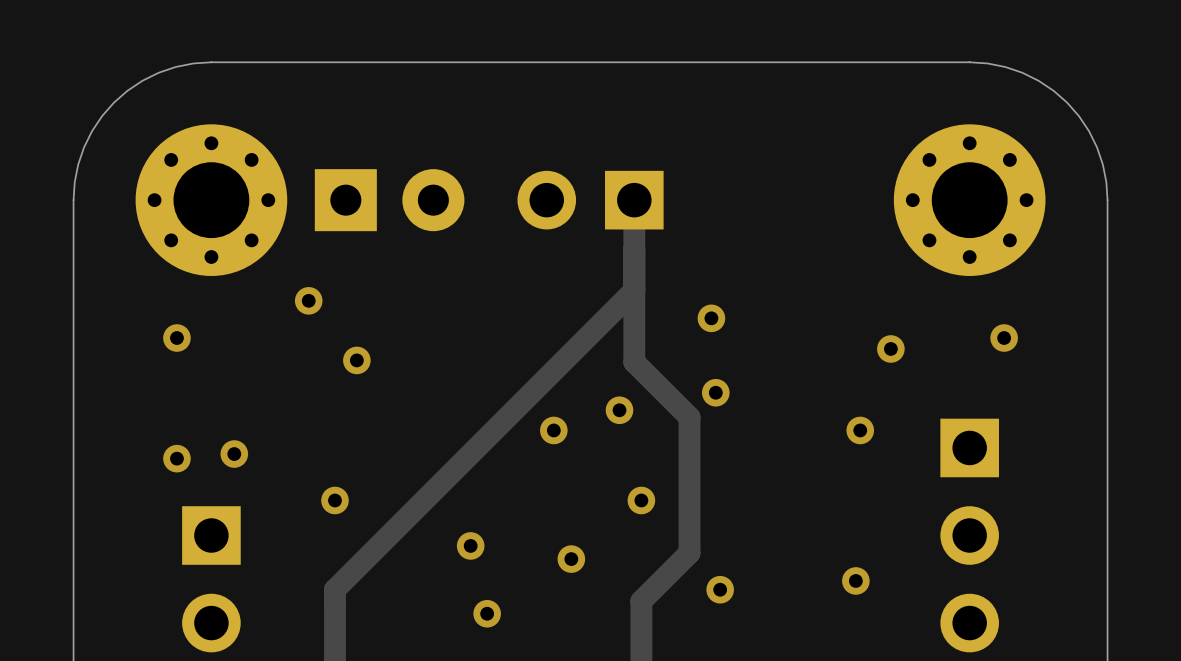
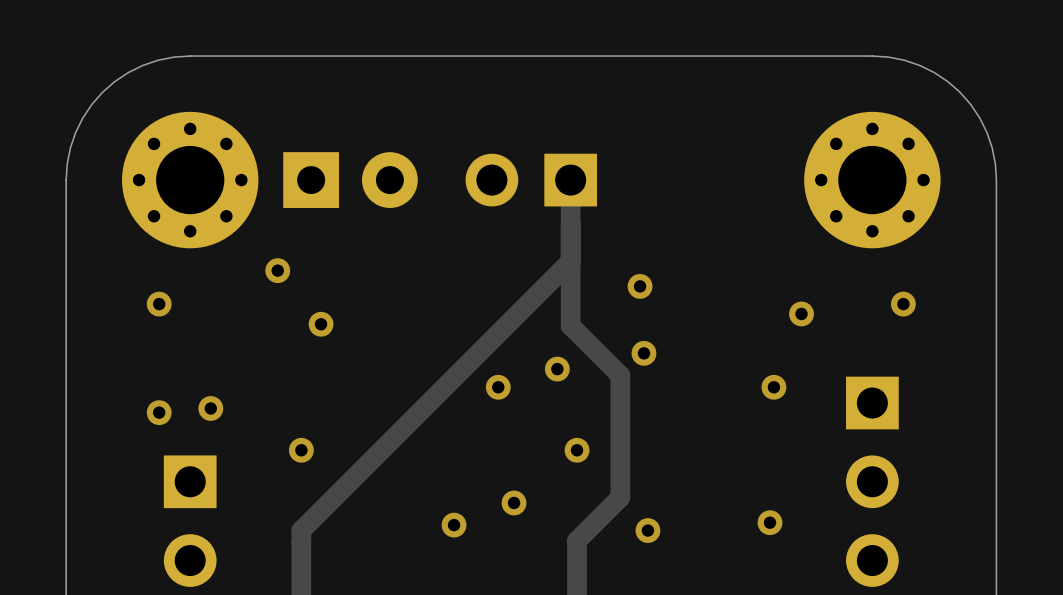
via: (470, 545) -> none
via: none -> (454, 525)
via: (487, 613) -> none

